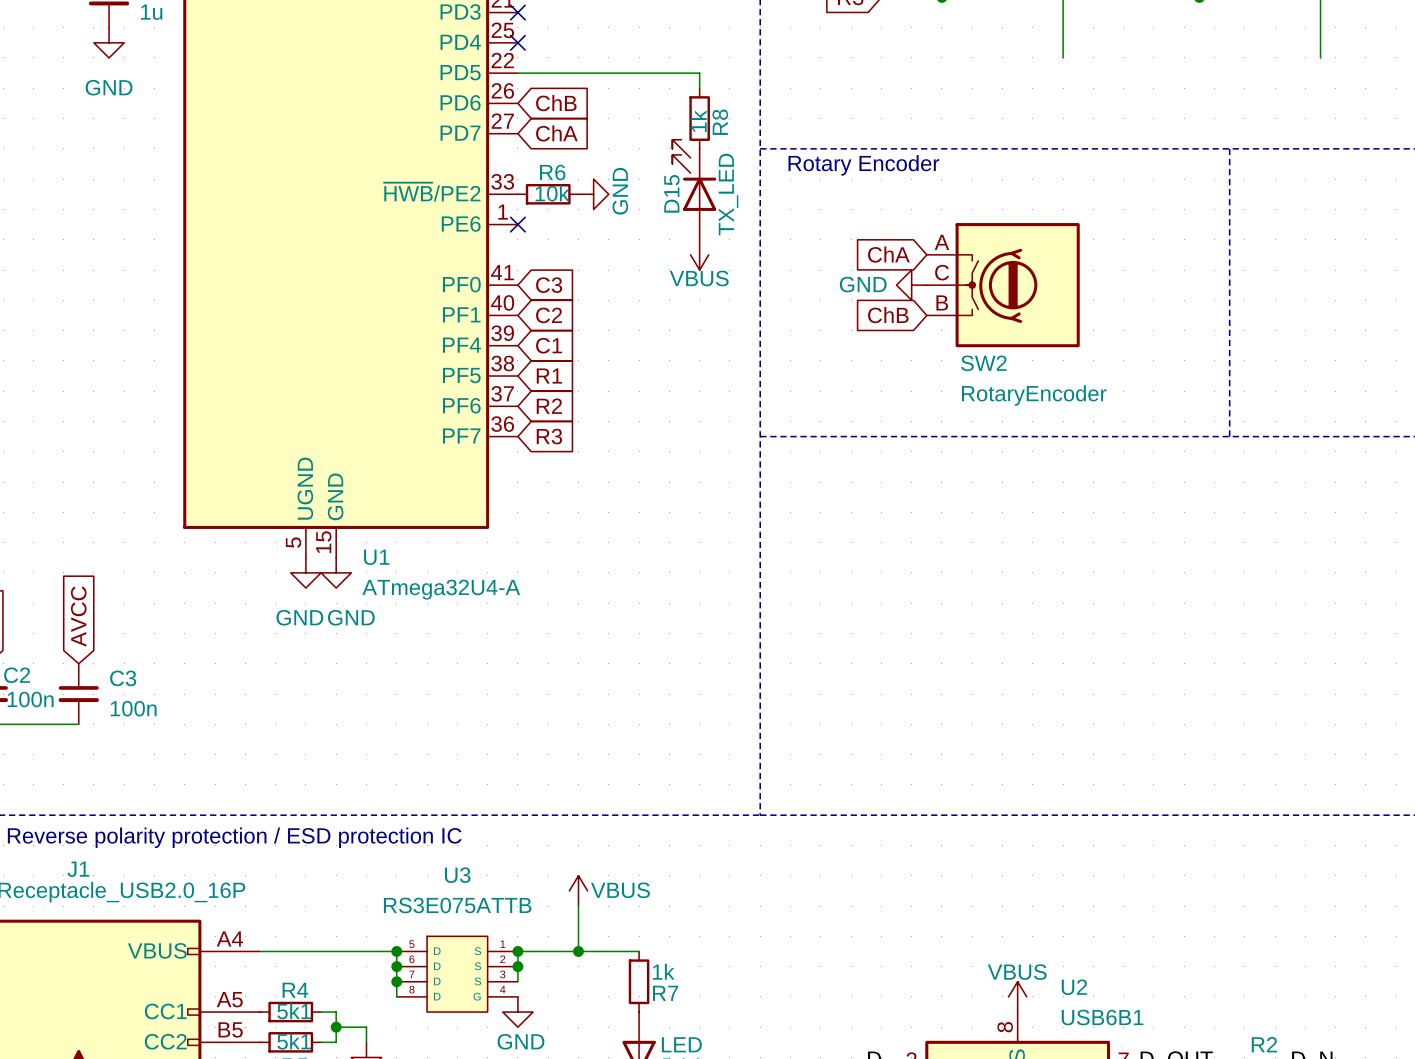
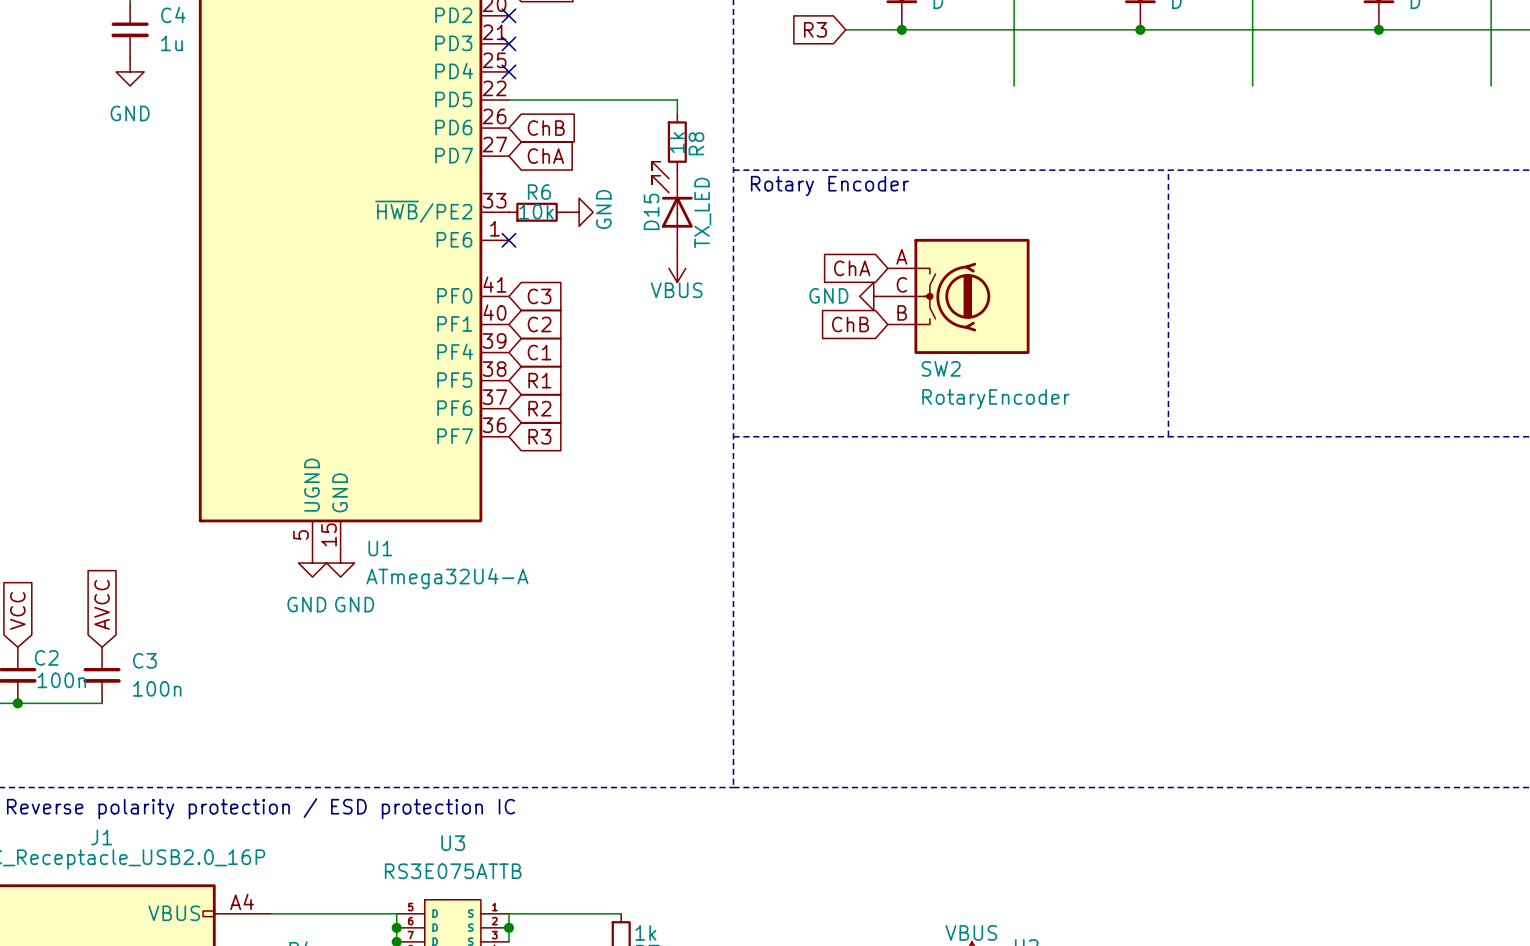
power symbol: VBUS (578, 890) -> none
wire: (578, 906) (578, 951) -> none
junction: (396, 951) -> none
junction: (517, 951) -> none
junction: (578, 951) -> none

